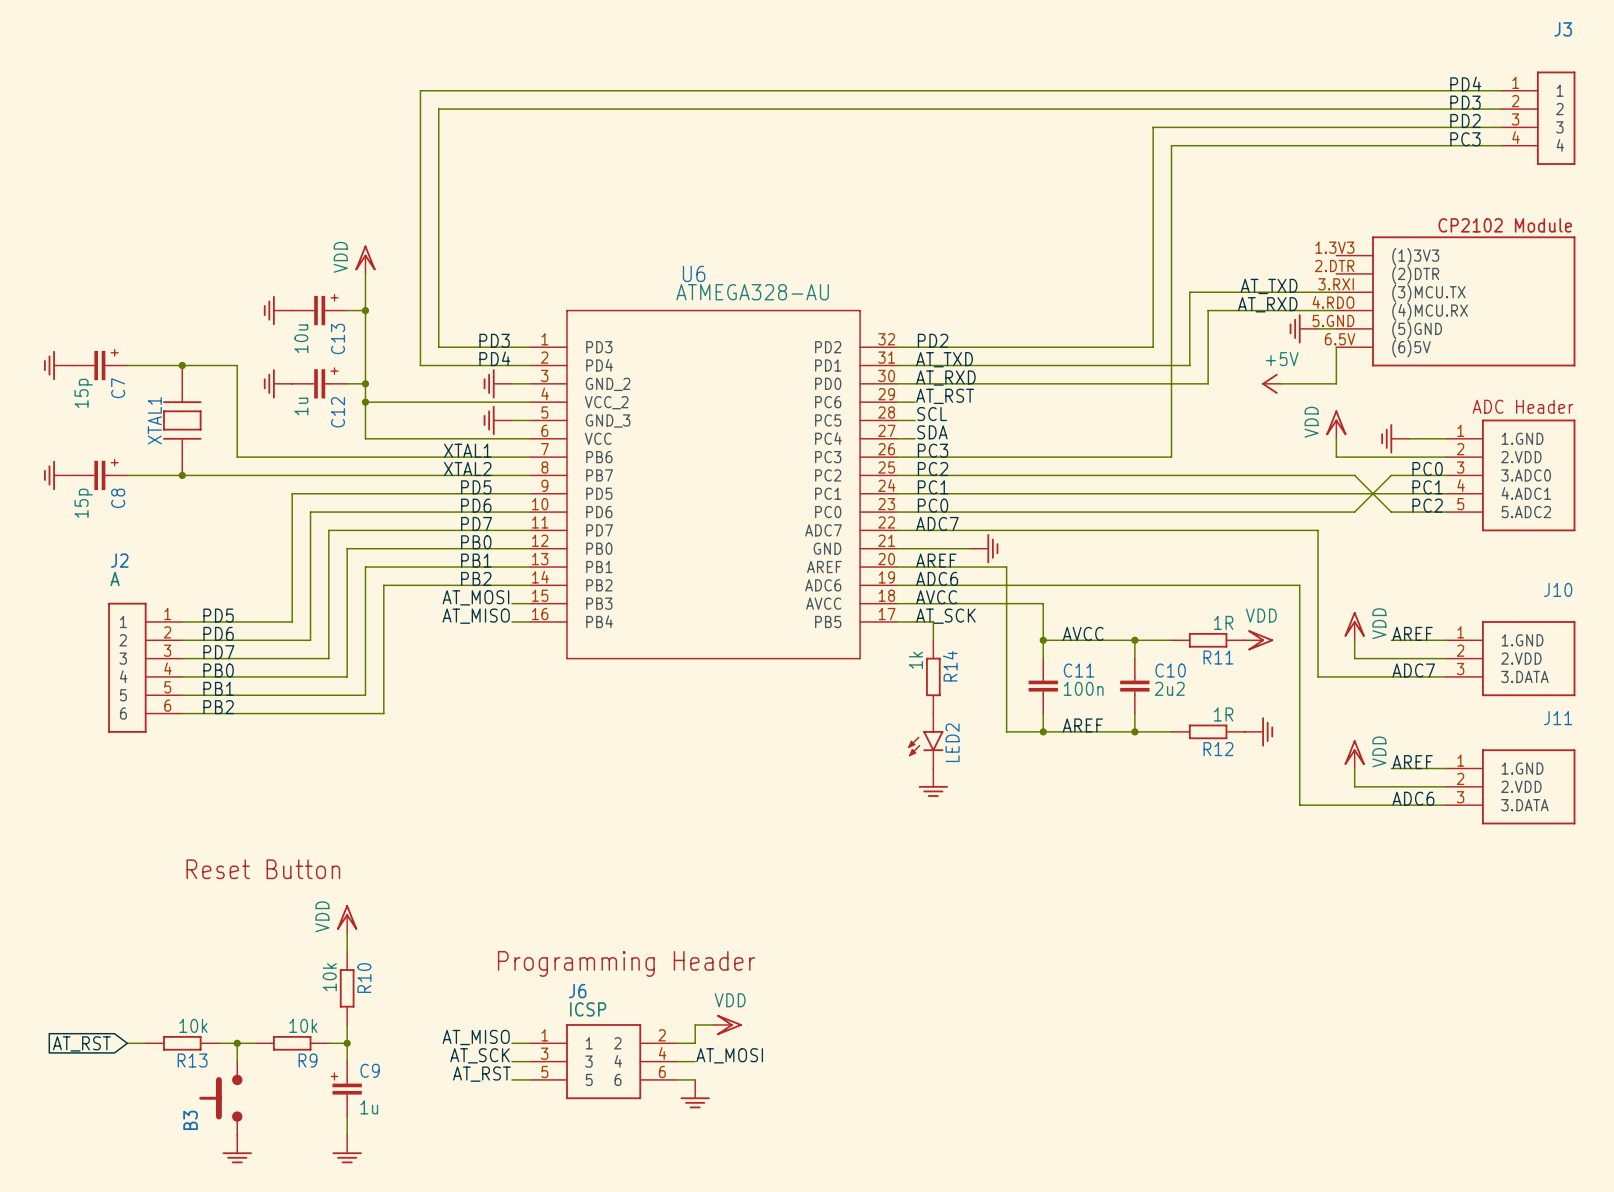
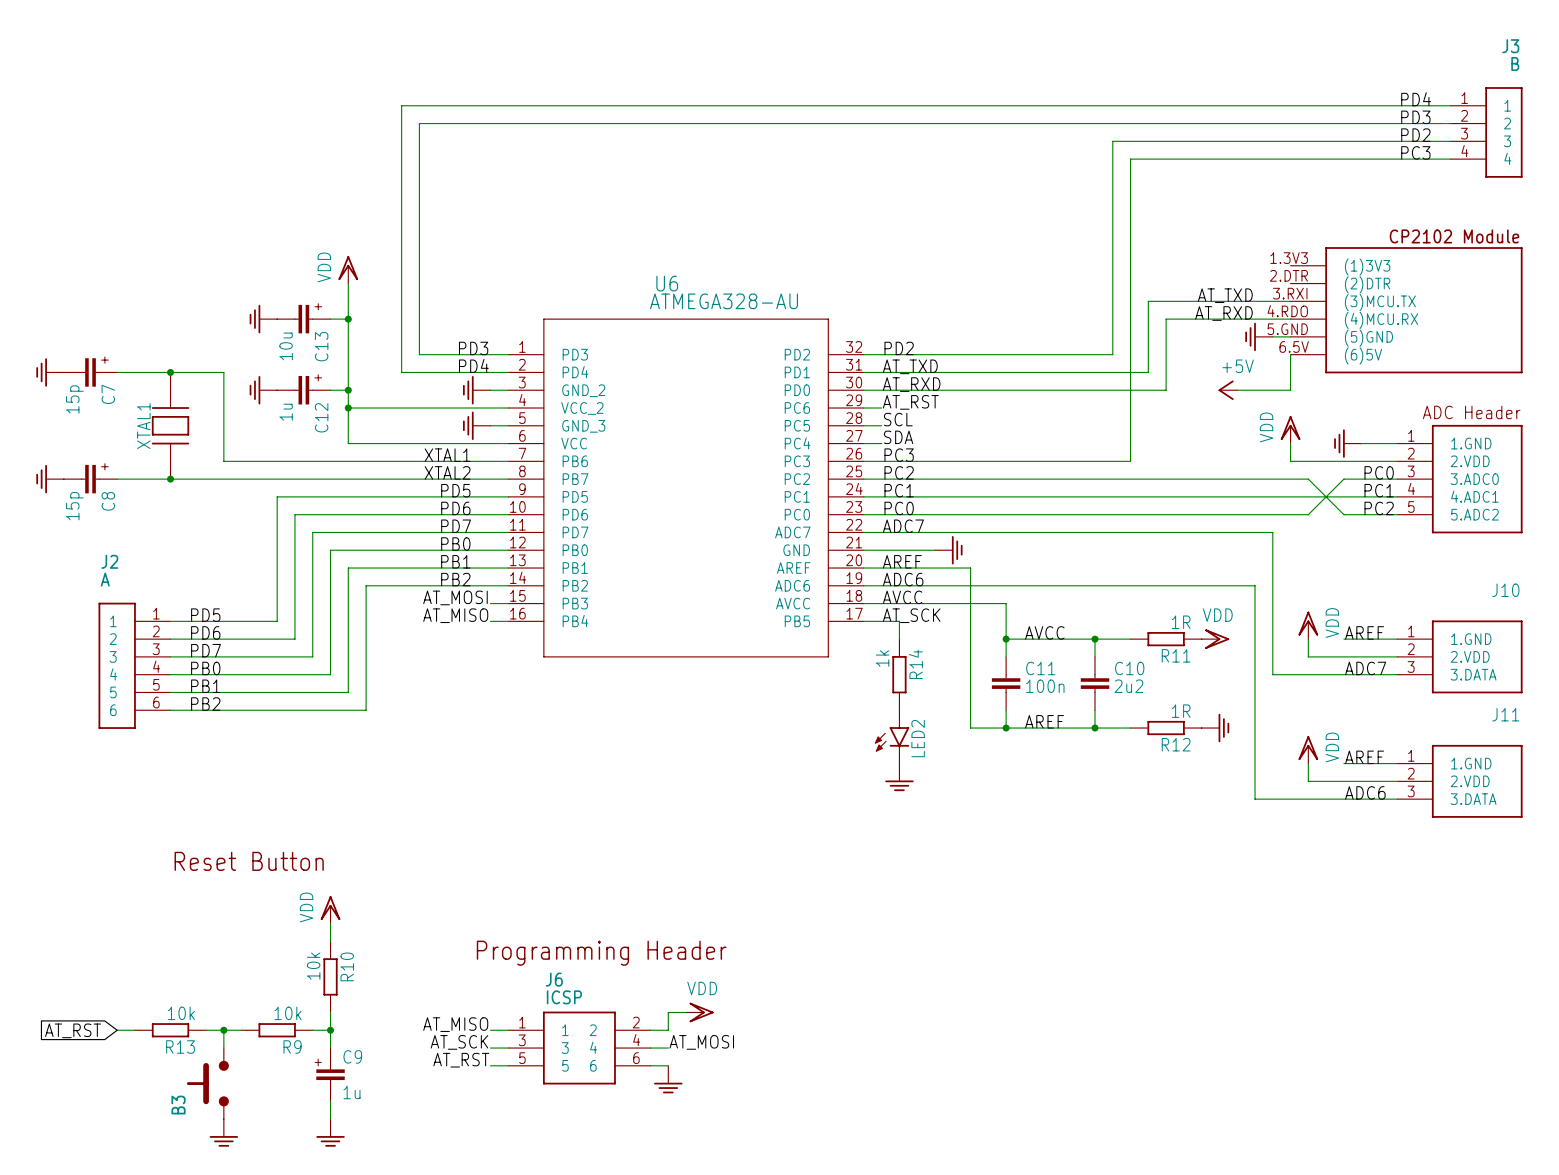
J3 value: none -> B (1515, 63)

